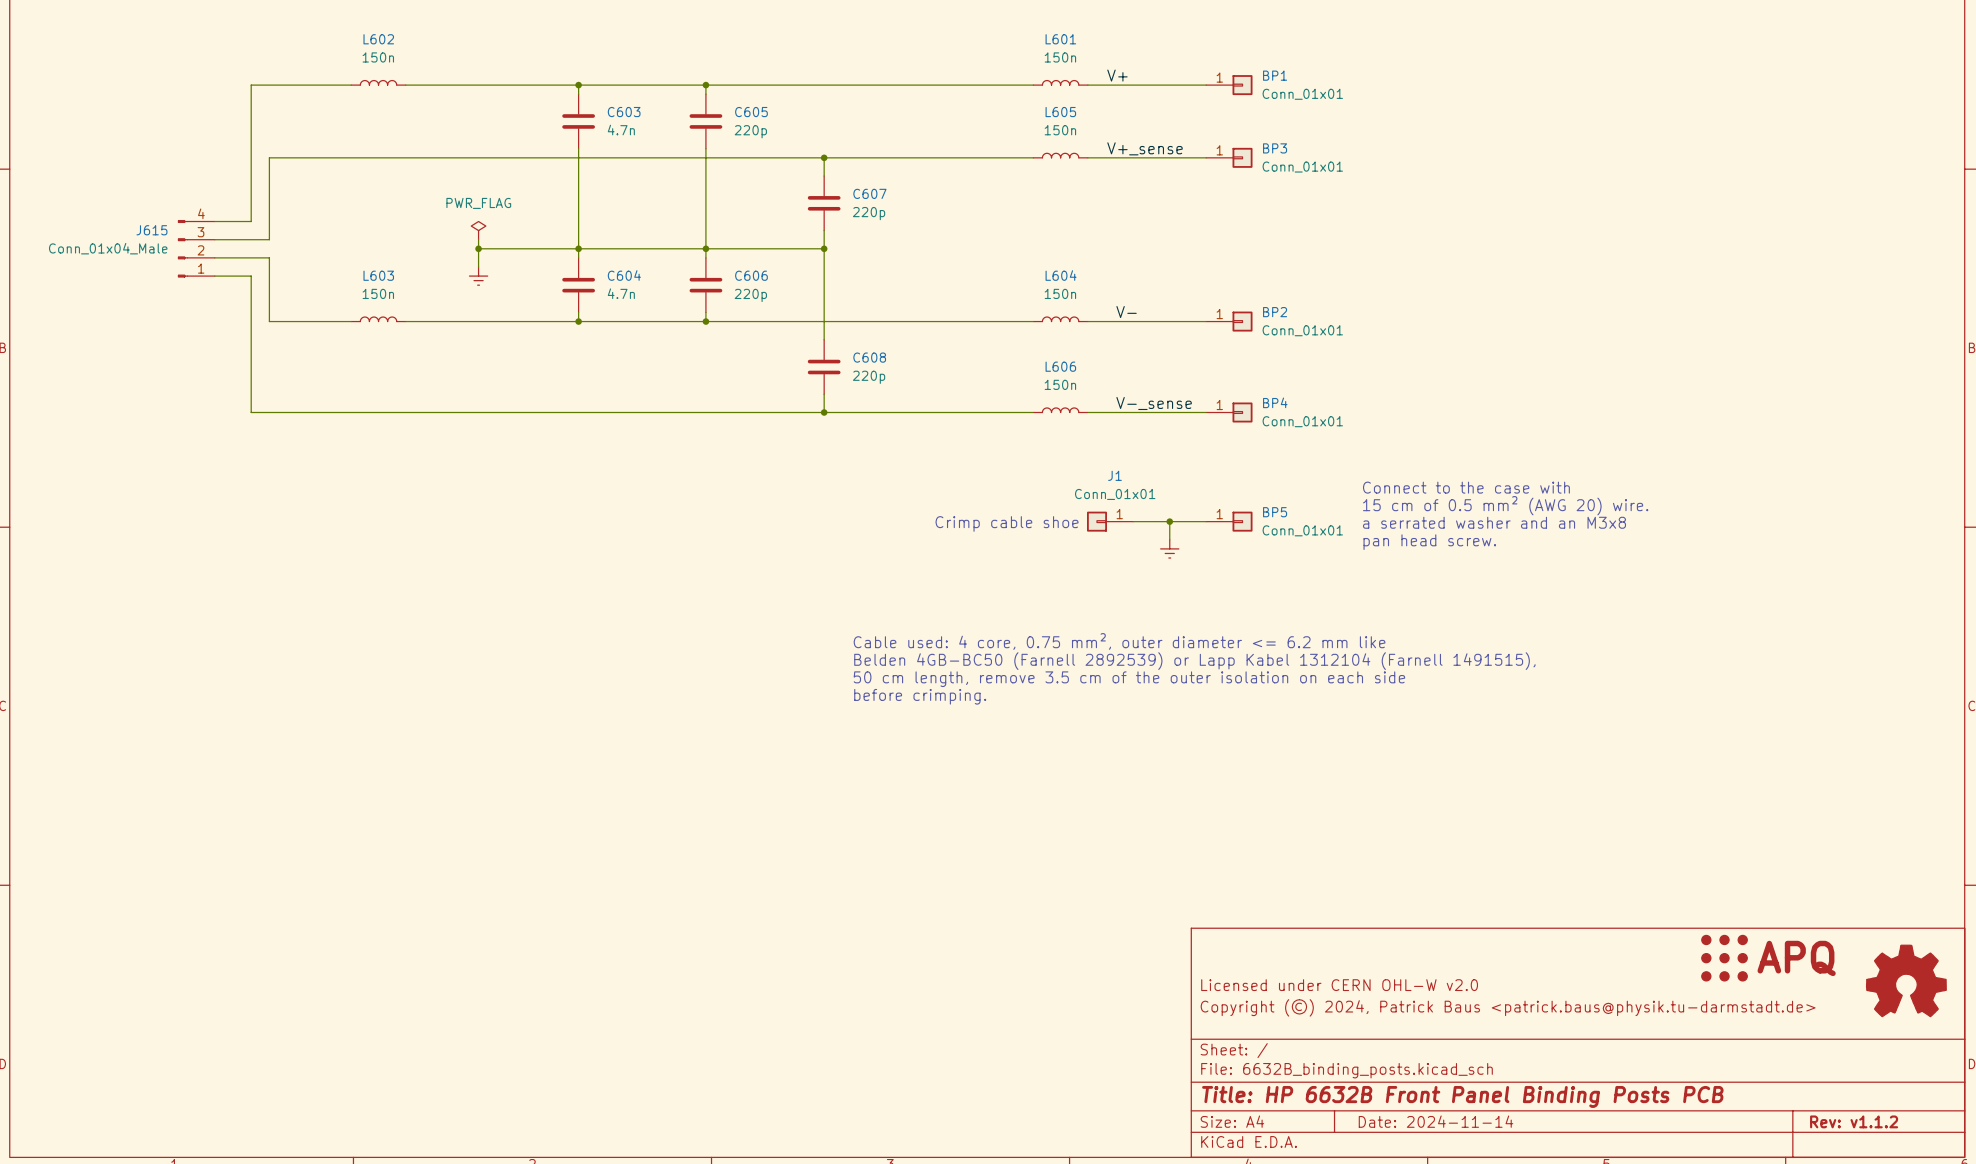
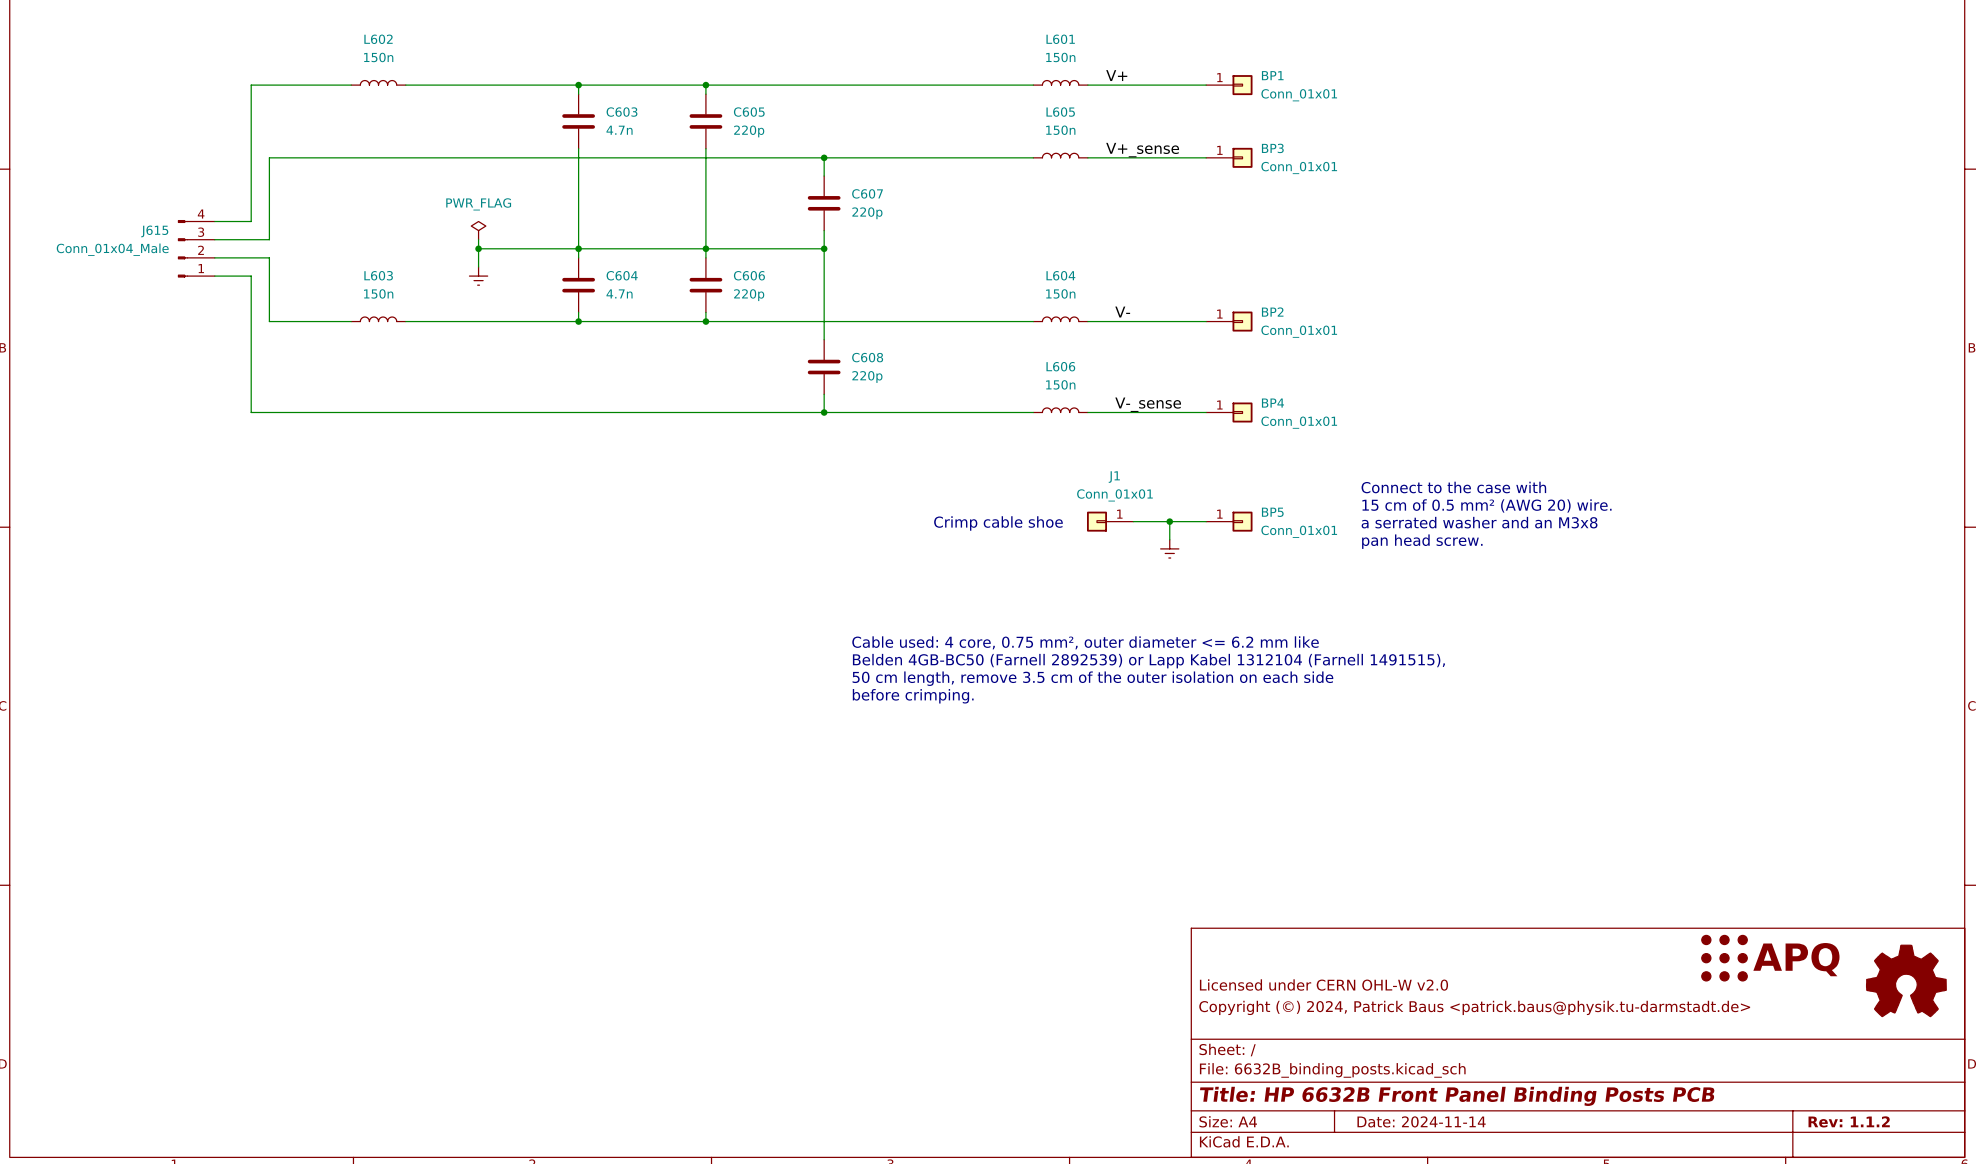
title block: Rev: v1.1.2 (1854, 1121) -> Rev: 1.1.2 (1849, 1121)

